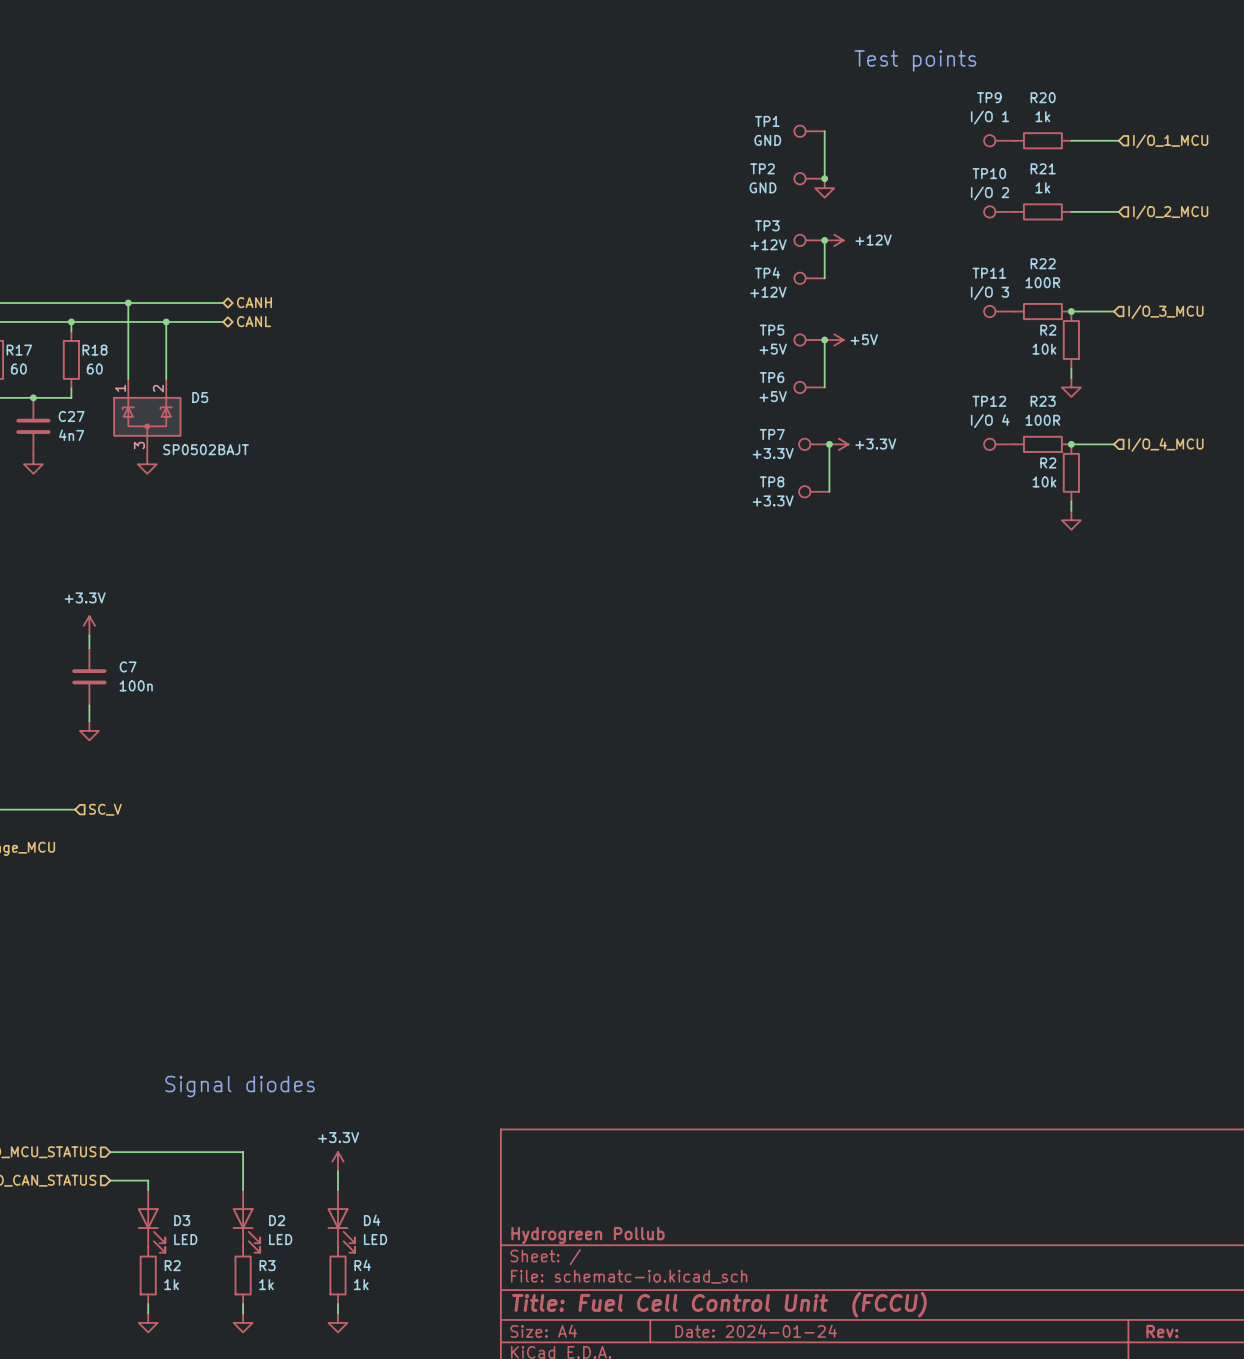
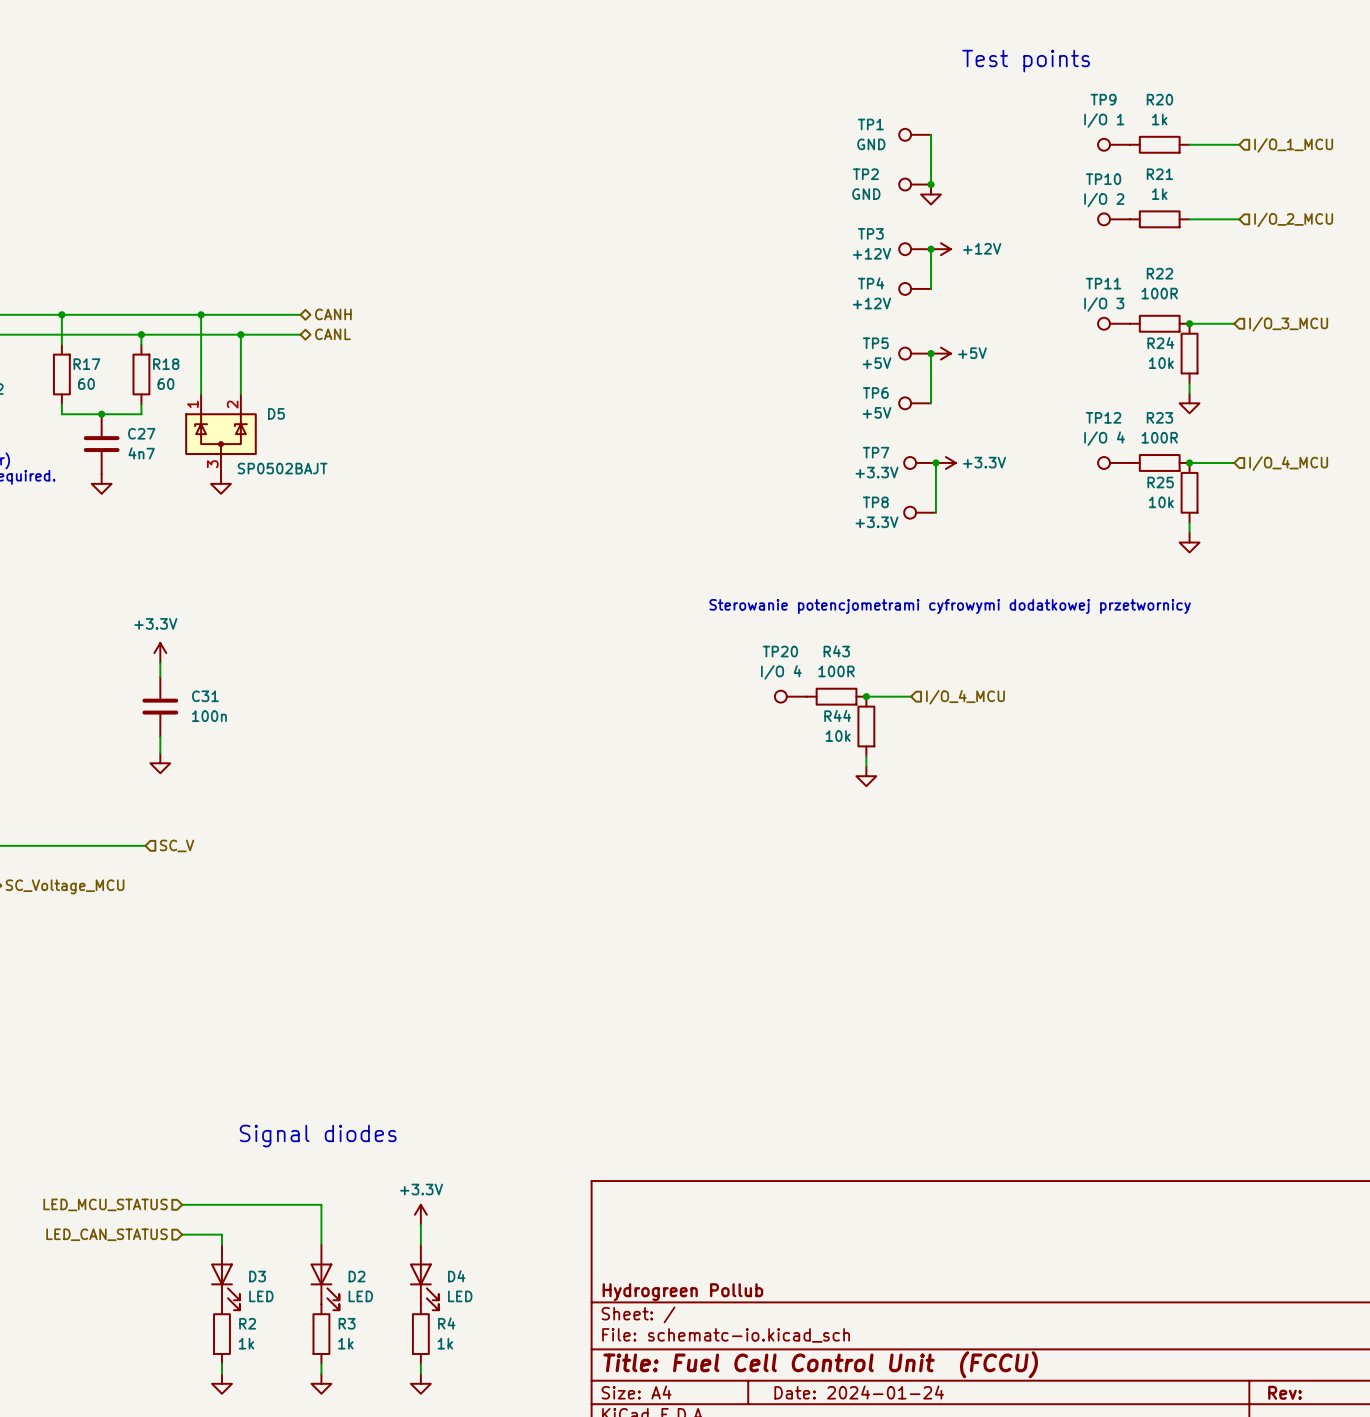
R2 name: R2 (1048, 330) -> R24 (1160, 343)
R2 name: R2 (1048, 462) -> R25 (1160, 482)
text: none -> Sterowanie potencjometrami cyfrowymi dodatkowej przetwornicy (950, 606)
C7 name: C7 (128, 666) -> C31 (205, 696)
TP20: none -> I/O 4 (790, 696)
R43: none -> 100R (836, 696)
wire: none -> (866, 696) (911, 696)
junction: none -> (866, 696)
hierarchical label: none -> I/O_4_MCU (965, 697)
R44: none -> 10k (866, 726)
wire: none -> (866, 756) (866, 766)
power symbol: none -> (866, 776)

